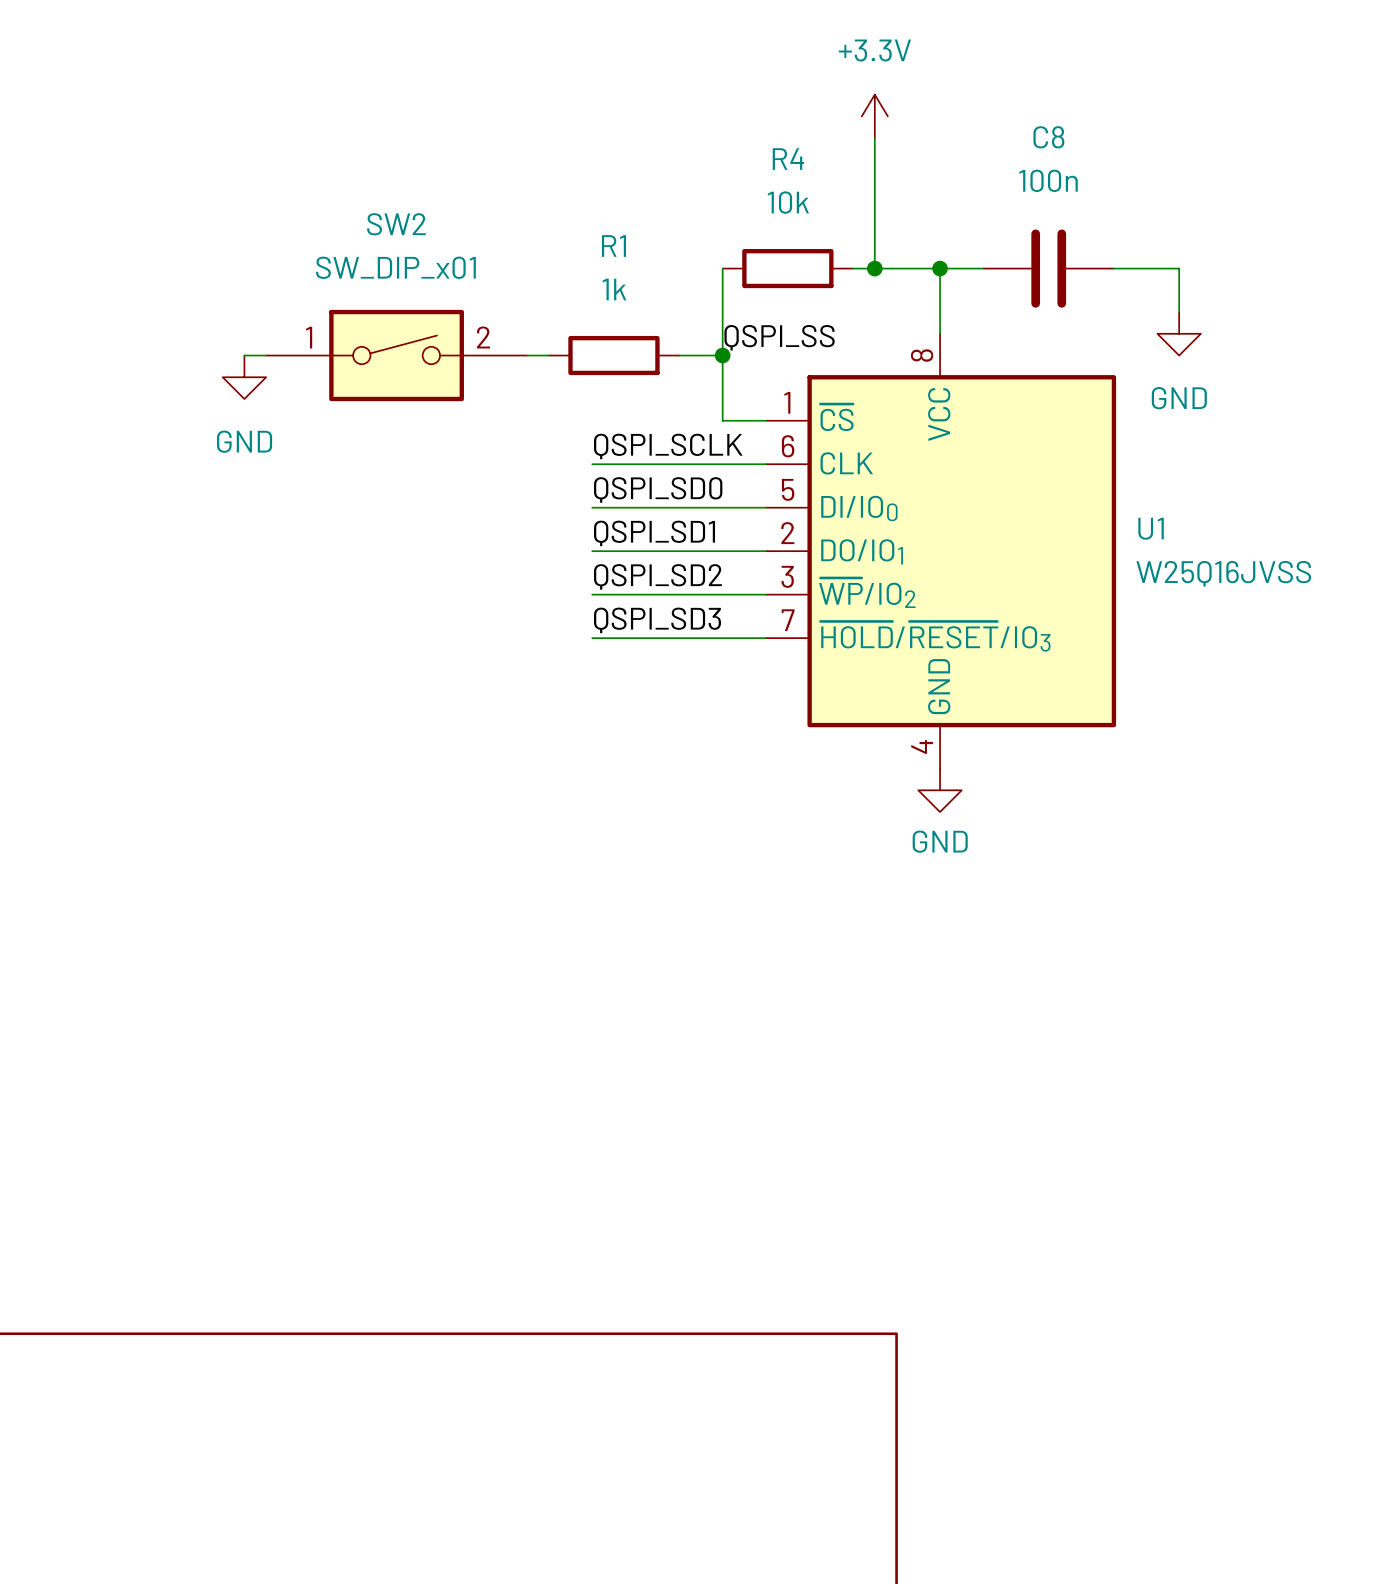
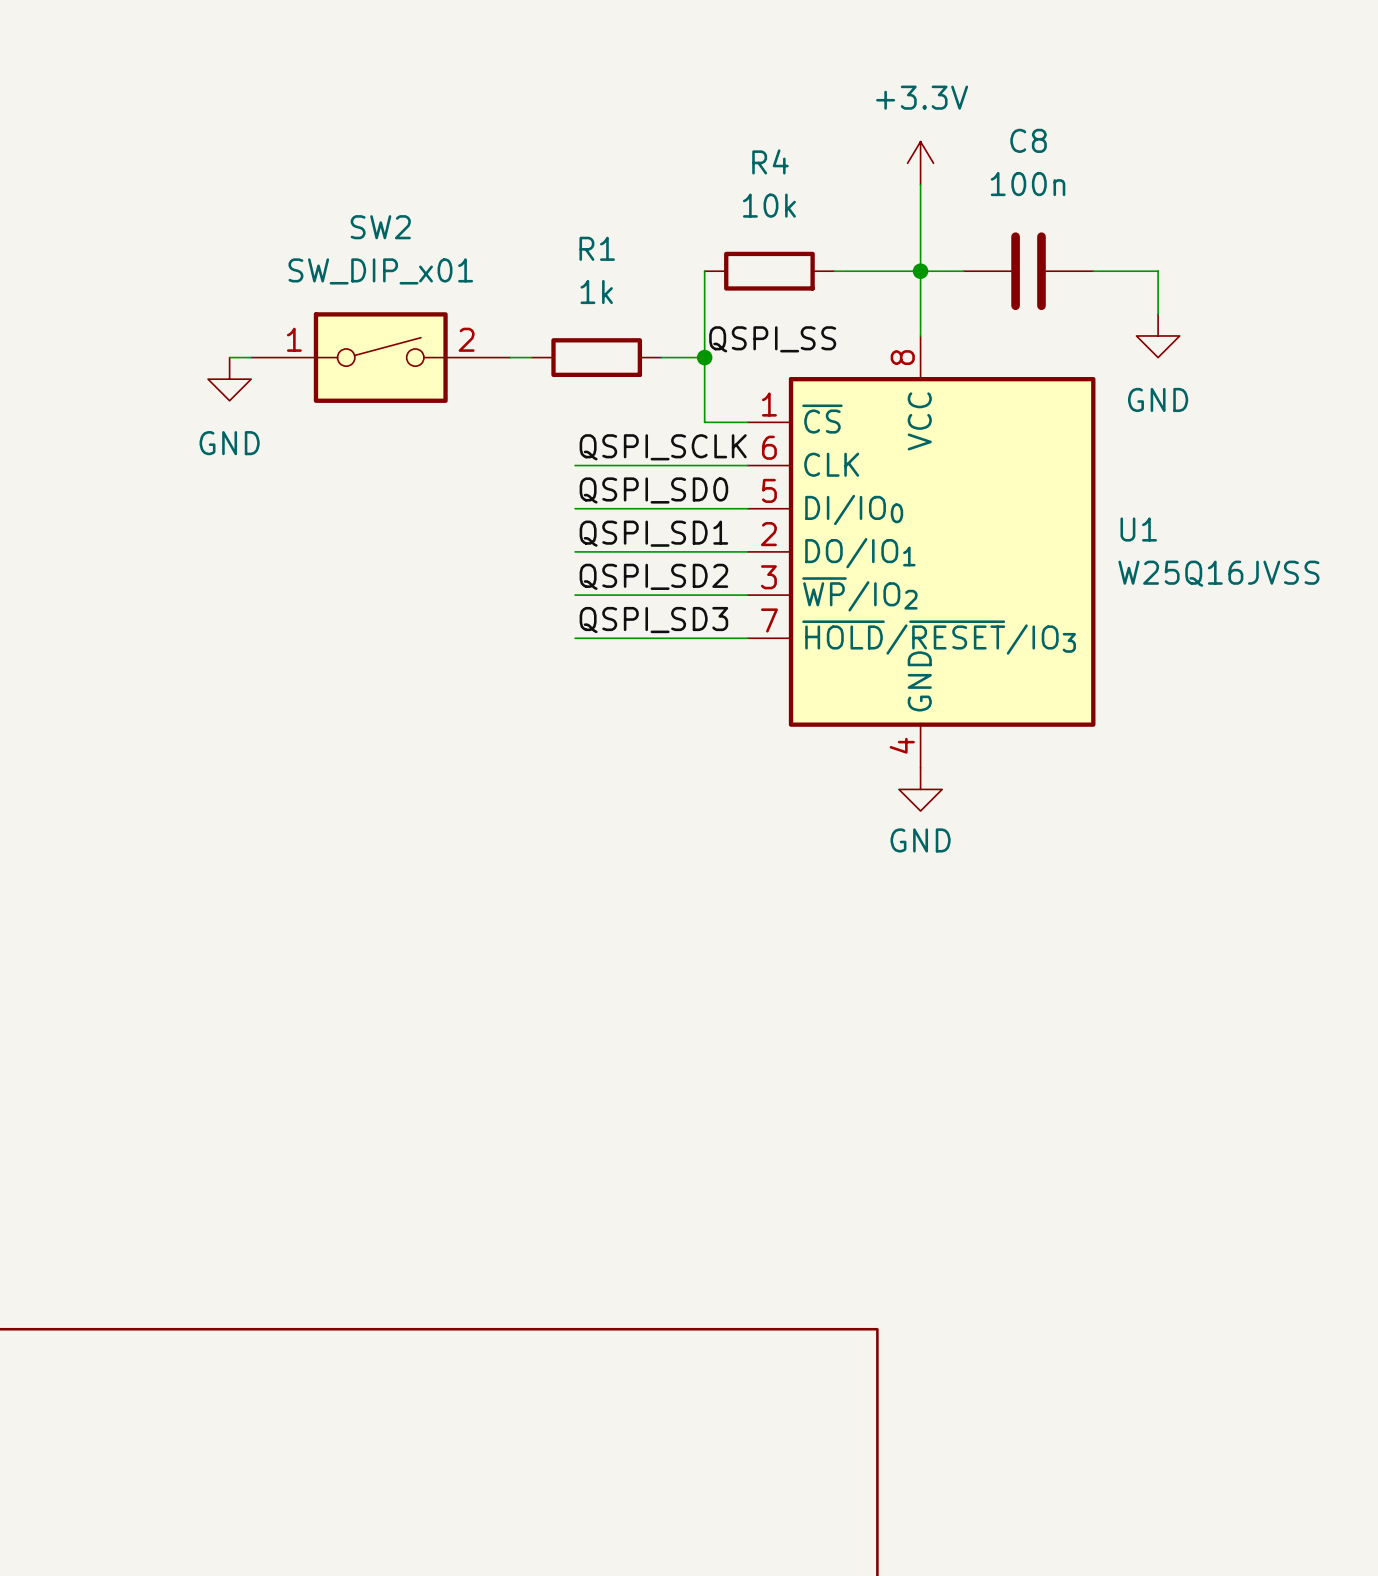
power symbol position: +3.3V (874, 116) -> +3.3V (920, 163)
wire: (874, 138) (874, 268) -> none
wire: none -> (920, 184) (920, 271)
junction: (874, 268) -> none

